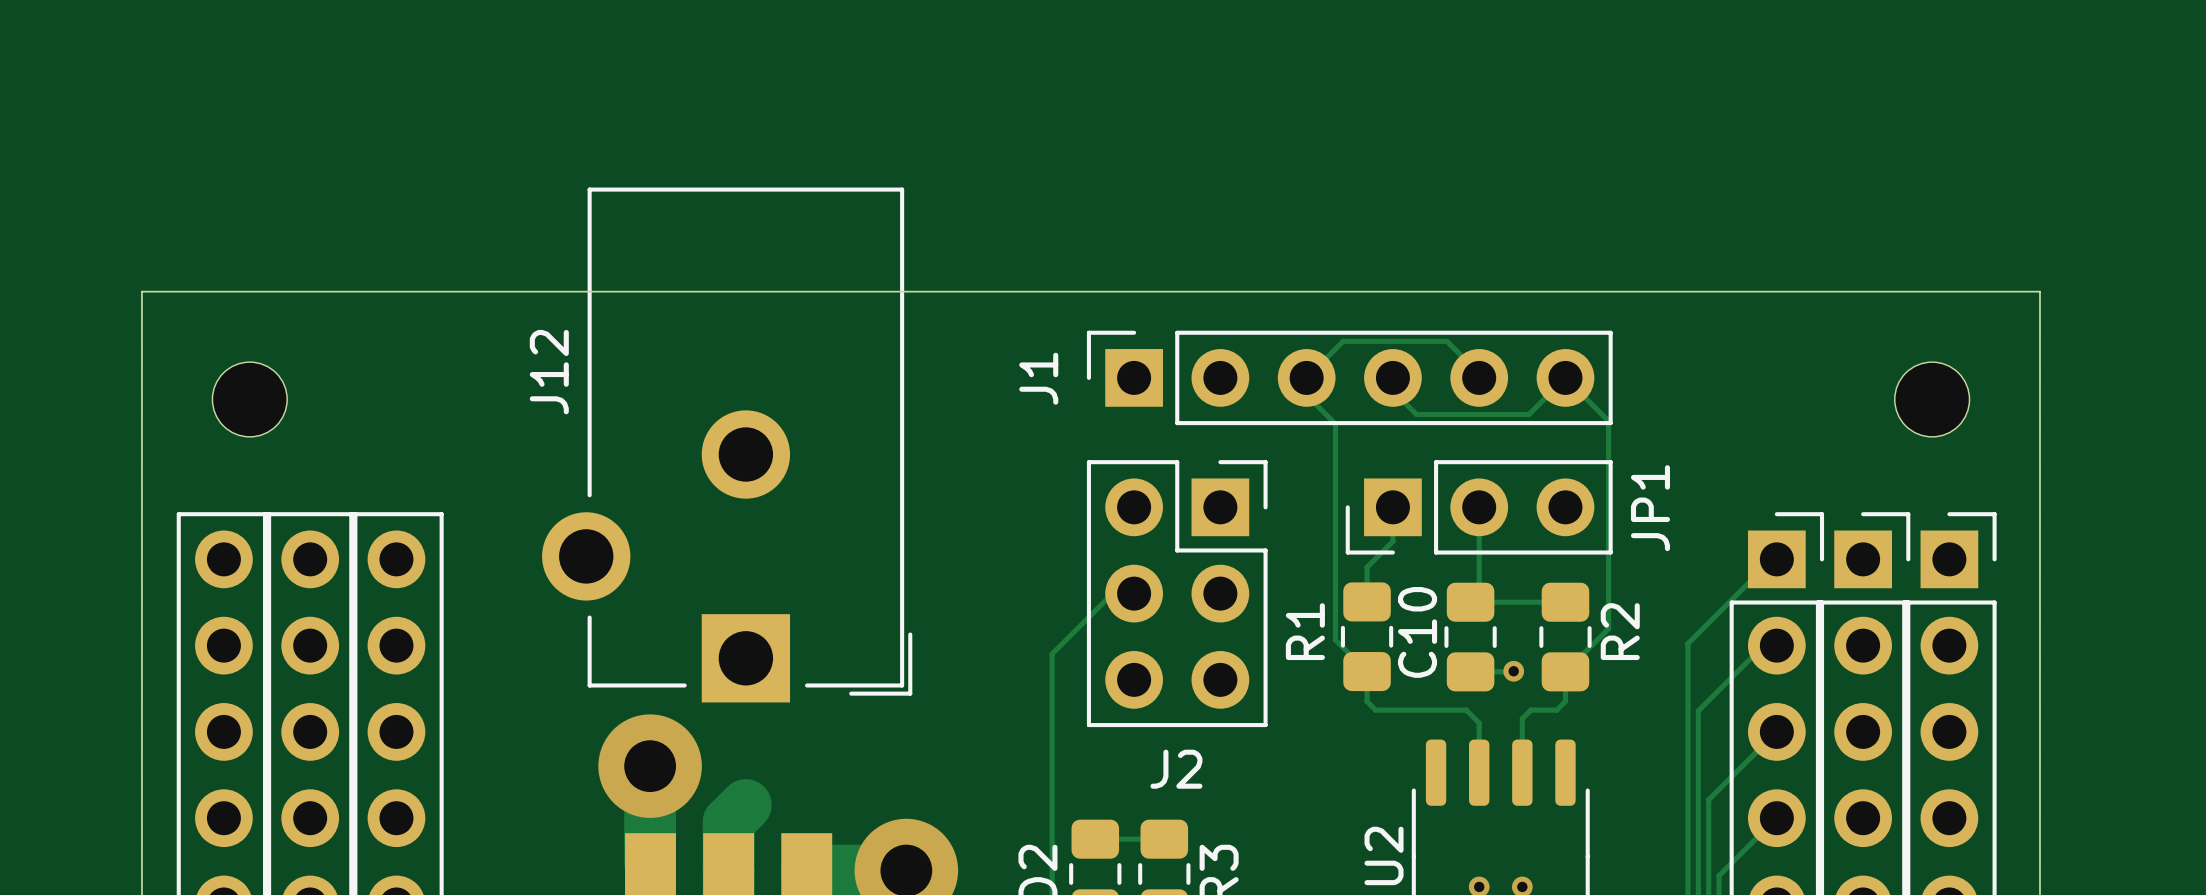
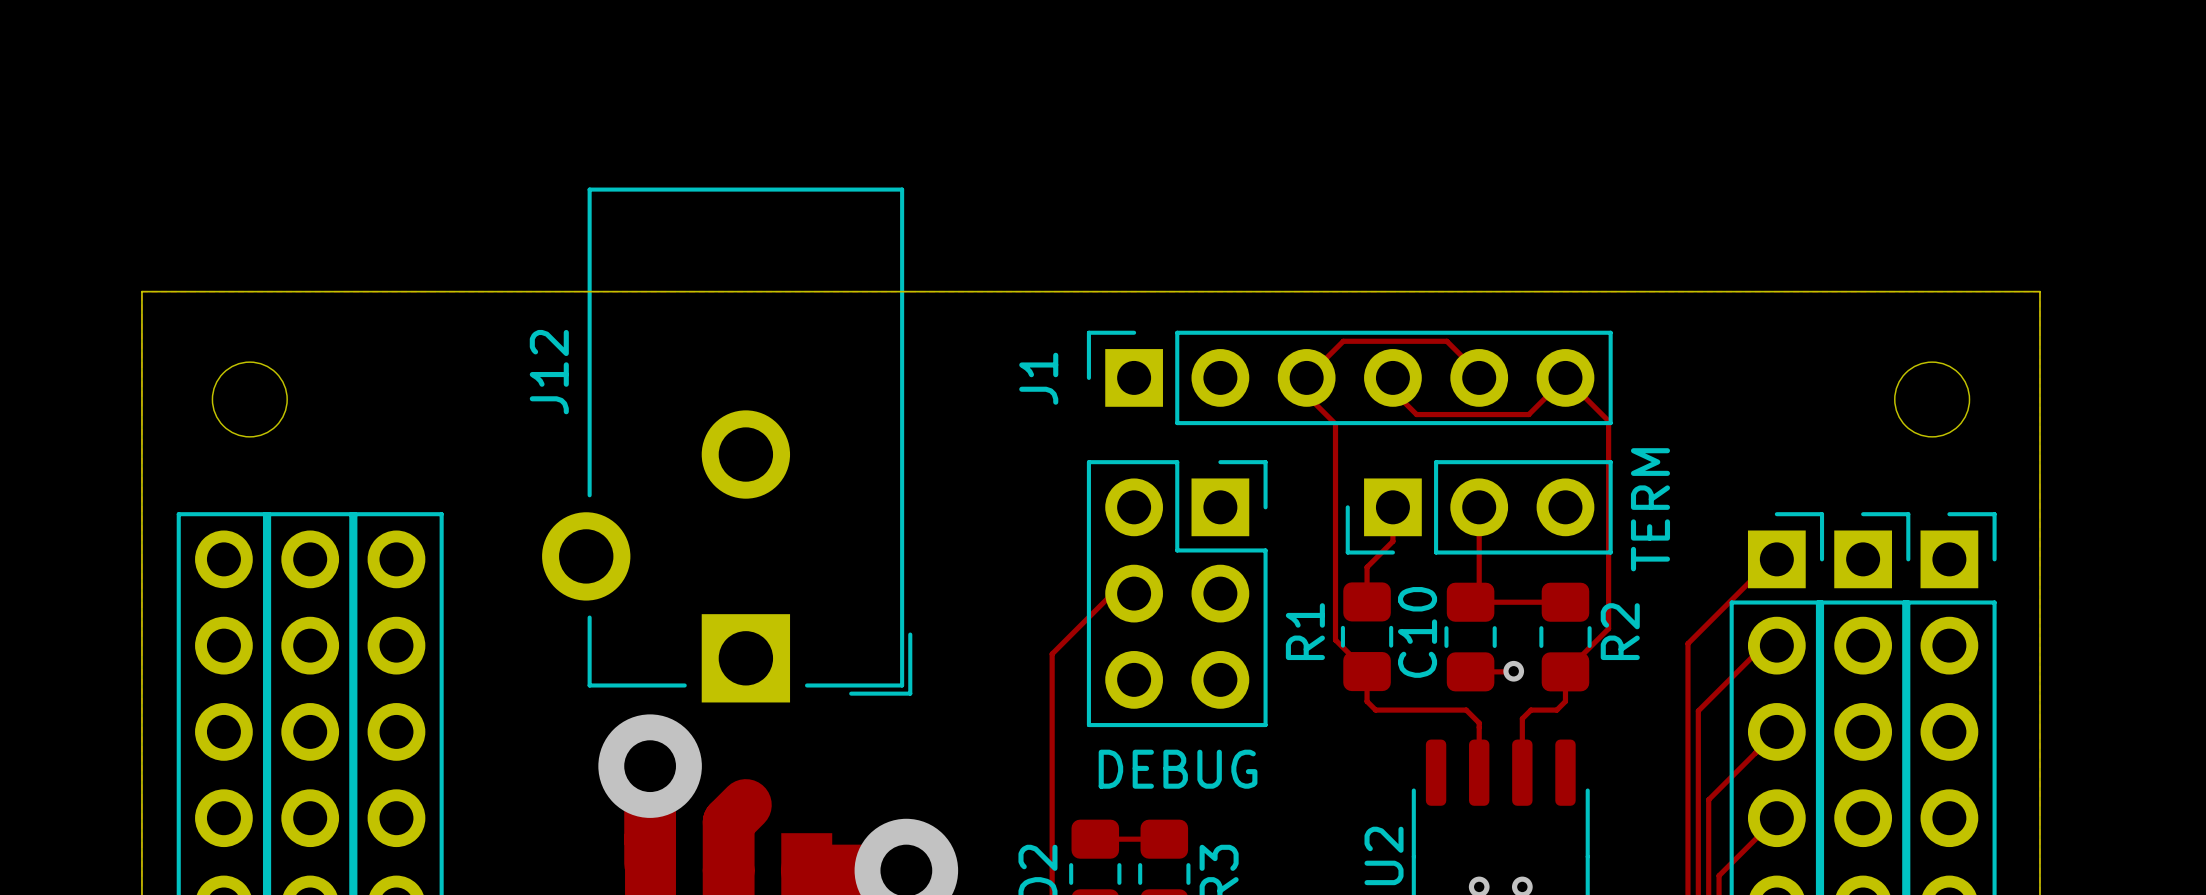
JP1 name: JP1 (1650, 508) -> TERM (1650, 509)
J2 name: J2 (1176, 769) -> DEBUG (1178, 769)

